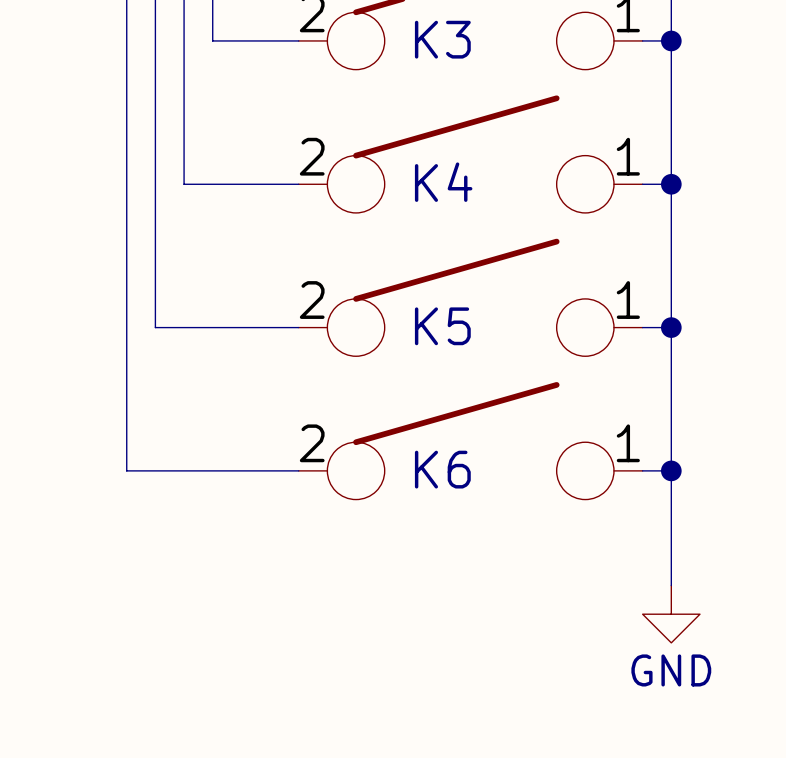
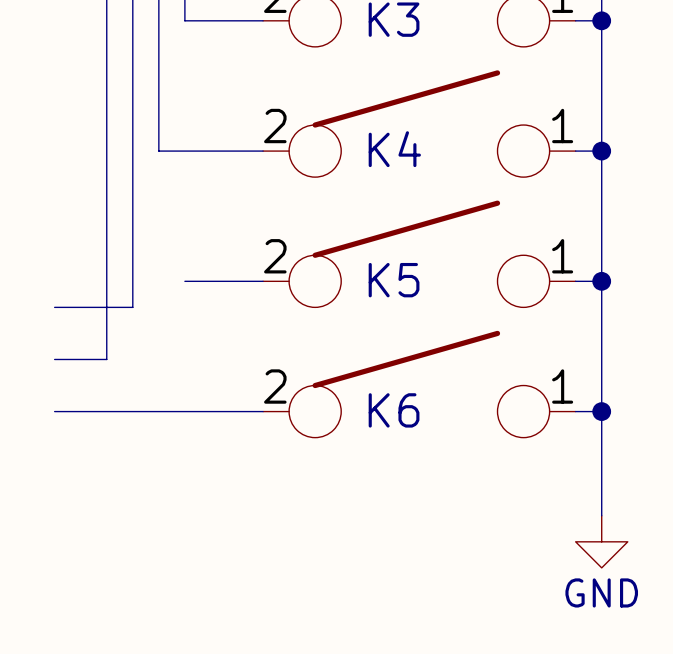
wire: (155, 327) (212, 327) -> (132, 281) (132, 307) (54, 307)
wire: (126, 413) (126, 470) -> (106, 359) (54, 359)
wire: none -> (54, 411) (106, 411)

